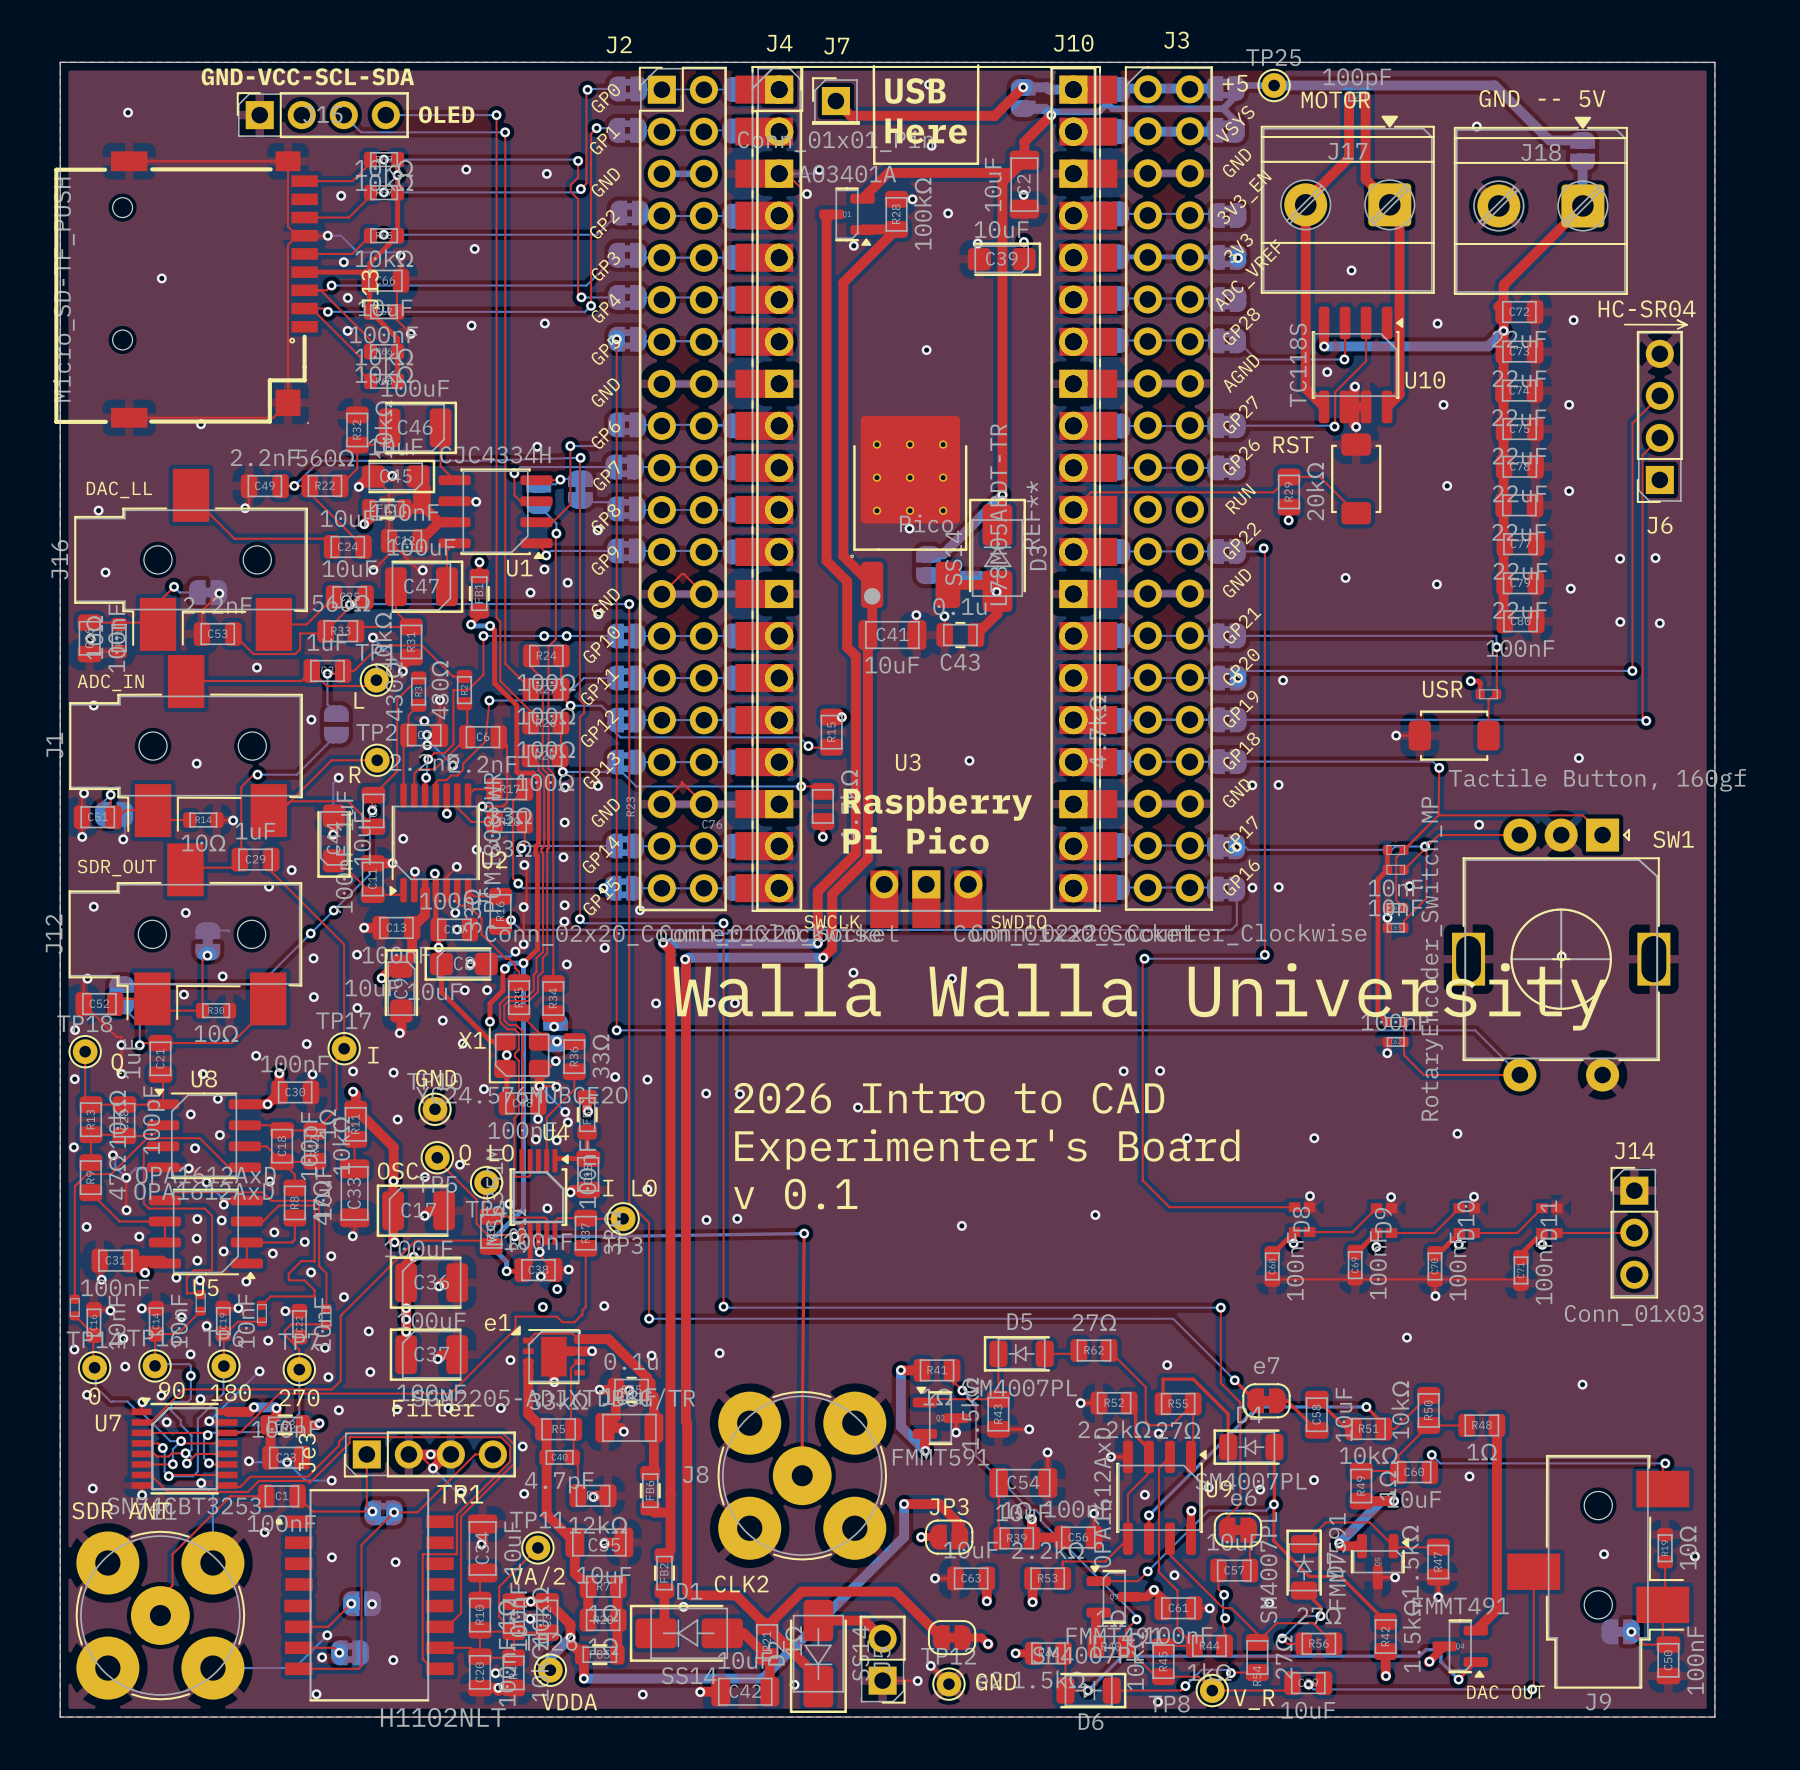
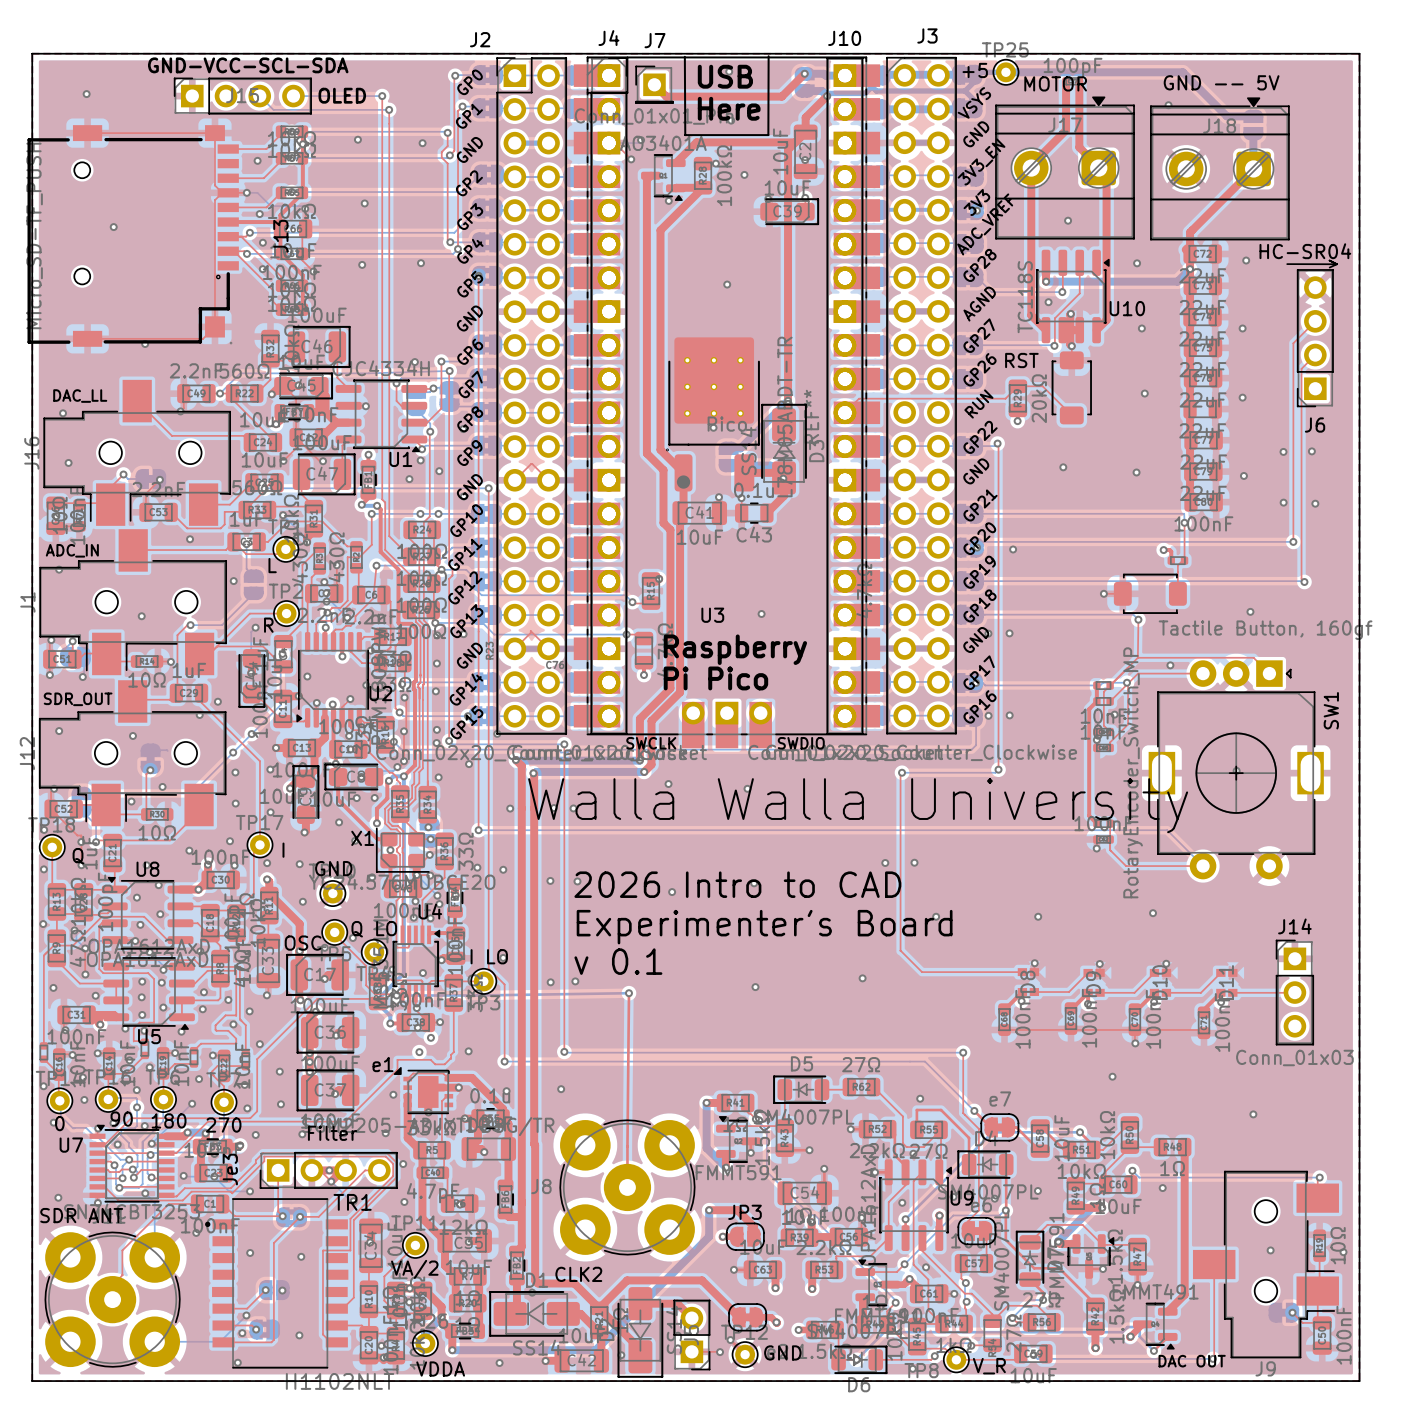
text: USR (1442, 689) -> none
SW1 name rotation: 0° (1673, 839) -> 90° counterclockwise (1331, 710)

